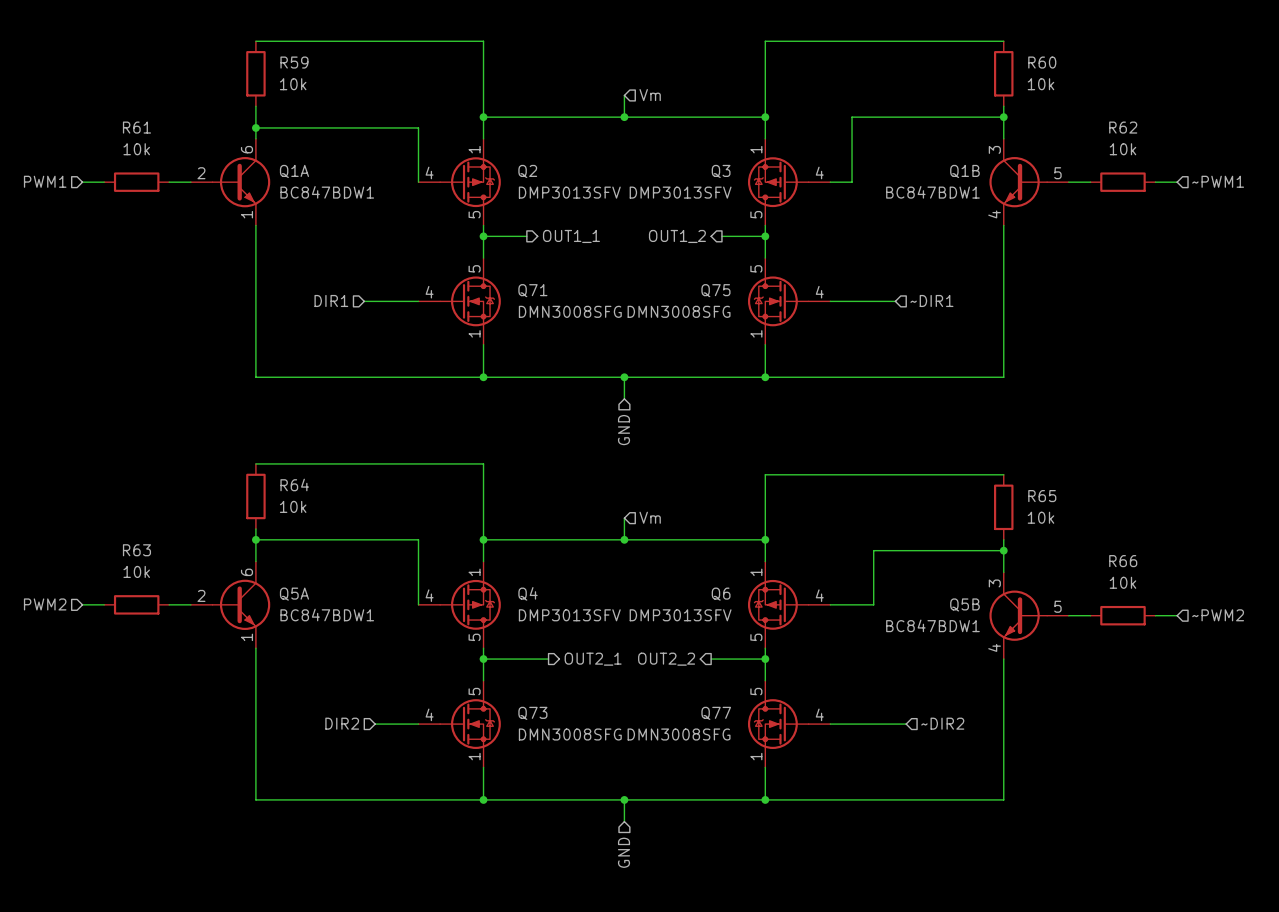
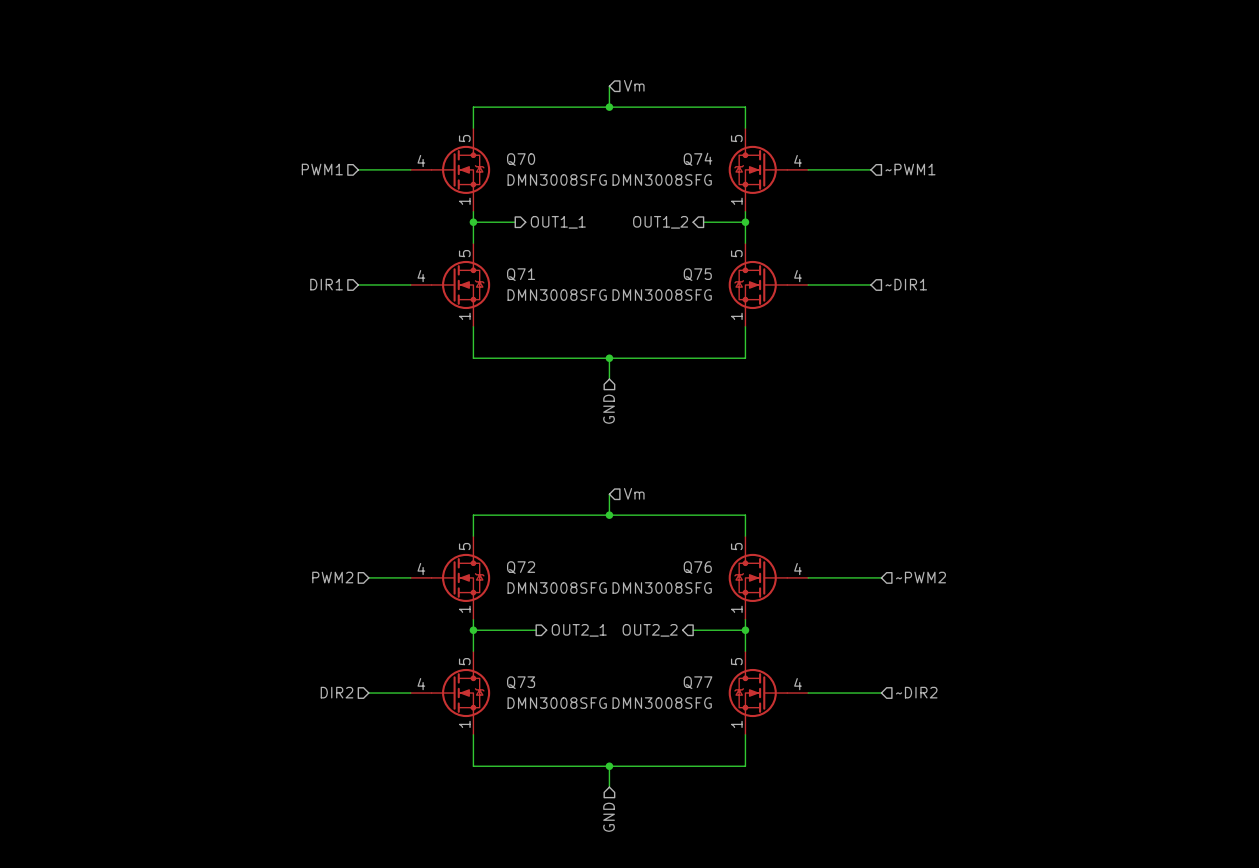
wire: (255, 41) (483, 41) (483, 117) -> none
wire: (1003, 41) (765, 41) (765, 117) -> none
R59: 10k (255, 73) -> none
R60: 10k (1003, 73) -> none
wire: (255, 106) (255, 138) -> none
wire: (1003, 106) (1003, 138) -> none
junction: (483, 117) -> none
junction: (765, 117) -> none
wire: (1003, 117) (852, 117) (852, 182) -> (870, 169) (829, 169)
junction: (1003, 117) -> none
wire: (255, 127) (418, 127) (418, 182) -> (358, 169) (410, 169)
junction: (255, 127) -> none
hierarchical label: PWM1 (45, 181) -> none
hierarchical label: none -> PWM1 (322, 169)
hierarchical label: none -> ~PWM1 (910, 169)
hierarchical label: ~PWM1 (1218, 181) -> none
wire: (82, 182) (104, 182) -> none
R61: 10k (136, 182) -> none
wire: (169, 182) (190, 182) -> none
Q1A: BC847BDW1 (230, 182) -> none
Q2: DMP3013SFV (459, 182) -> none
Q70: none -> DMN3008SFG (450, 169)
Q3: DMP3013SFV (789, 182) -> none
Q74: none -> DMN3008SFG (768, 169)
Q1B: BC847BDW1 (1029, 182) -> none
wire: (1068, 182) (1090, 182) -> none
R62: 10k (1122, 182) -> none
wire: (1155, 182) (1177, 182) -> none
wire: (255, 225) (255, 377) (483, 377) -> none
wire: (1003, 225) (1003, 377) (765, 377) -> none
junction: (483, 377) -> none
junction: (765, 377) -> none
wire: (255, 463) (483, 463) (483, 539) -> none
wire: (1003, 474) (765, 474) (765, 539) -> none
R64: 10k (255, 496) -> none
R65: 10k (1003, 507) -> none
wire: (255, 528) (255, 561) -> none
wire: (255, 539) (418, 539) (418, 604) -> (368, 577) (410, 577)
junction: (255, 539) -> none
junction: (483, 539) -> none
junction: (765, 539) -> none
wire: (1003, 539) (1003, 572) -> none
wire: (1003, 550) (873, 550) (873, 604) -> (881, 577) (850, 577)
junction: (1003, 550) -> none
hierarchical label: PWM2 (45, 604) -> none
wire: (82, 604) (104, 604) -> none
R63: 10k (136, 604) -> none
wire: (169, 604) (190, 604) -> none
Q5A: BC847BDW1 (230, 604) -> none
hierarchical label: none -> PWM2 (332, 577)
Q4: DMP3013SFV (459, 604) -> none
Q72: none -> DMN3008SFG (450, 577)
Q6: DMP3013SFV (789, 604) -> none
Q76: none -> DMN3008SFG (768, 577)
hierarchical label: none -> ~PWM2 (920, 577)
Q5B: BC847BDW1 (1029, 615) -> none
wire: (1068, 615) (1090, 615) -> none
R66: 10k (1122, 615) -> none
wire: (1155, 615) (1177, 615) -> none
hierarchical label: ~PWM2 (1218, 615) -> none
wire: (255, 648) (255, 799) (483, 799) -> none
wire: (1003, 659) (1003, 799) (765, 799) -> none
junction: (483, 799) -> none
junction: (765, 799) -> none

